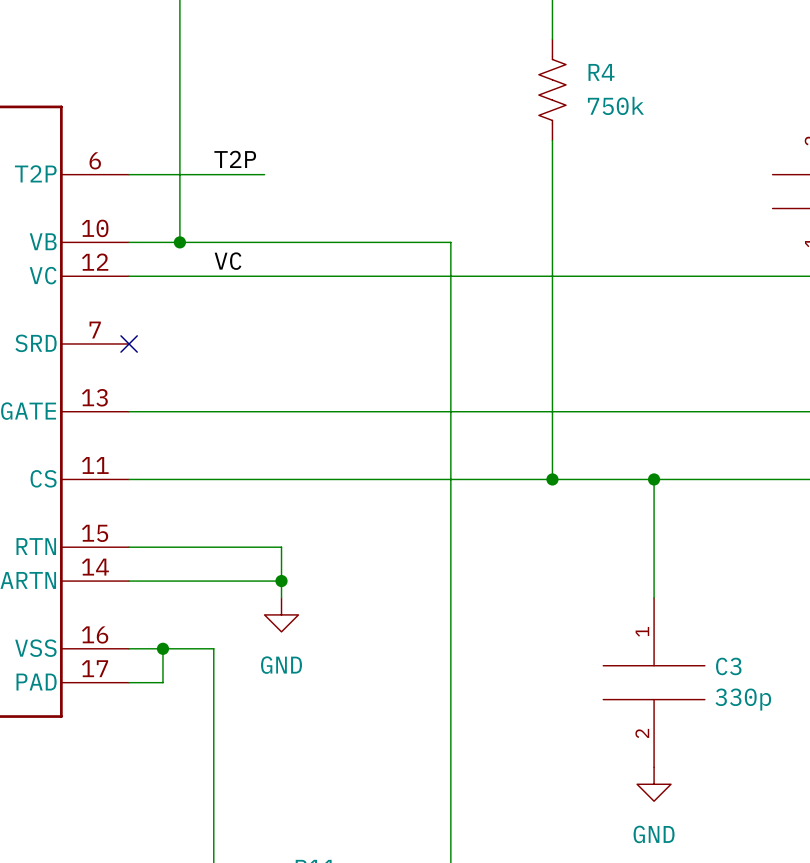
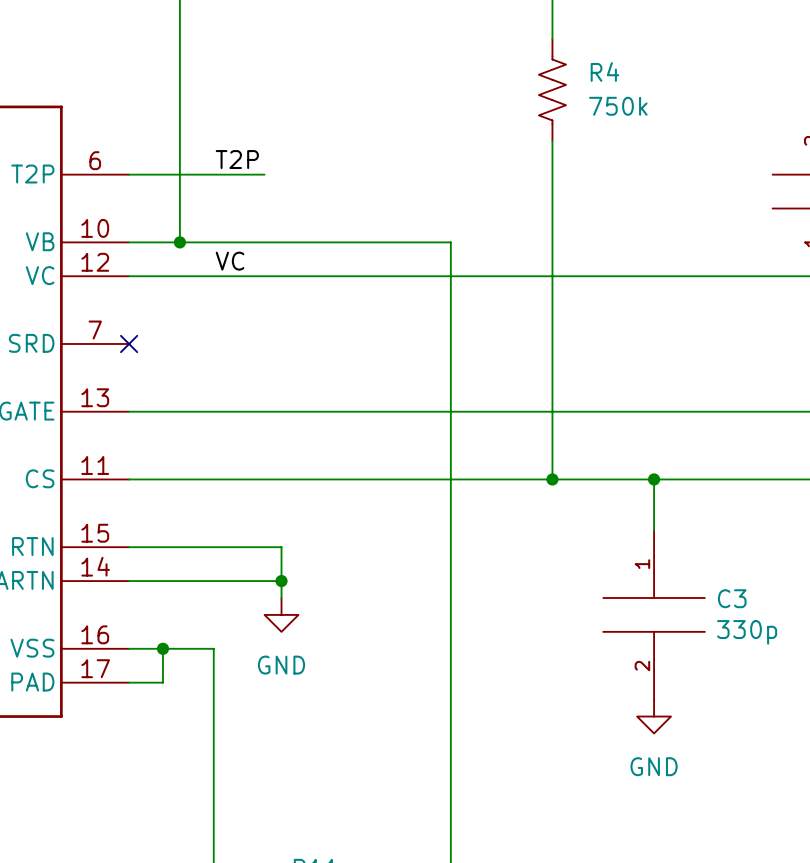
C3 position: (654, 682) -> (654, 614)
power symbol position: GND (654, 784) -> GND (654, 716)

